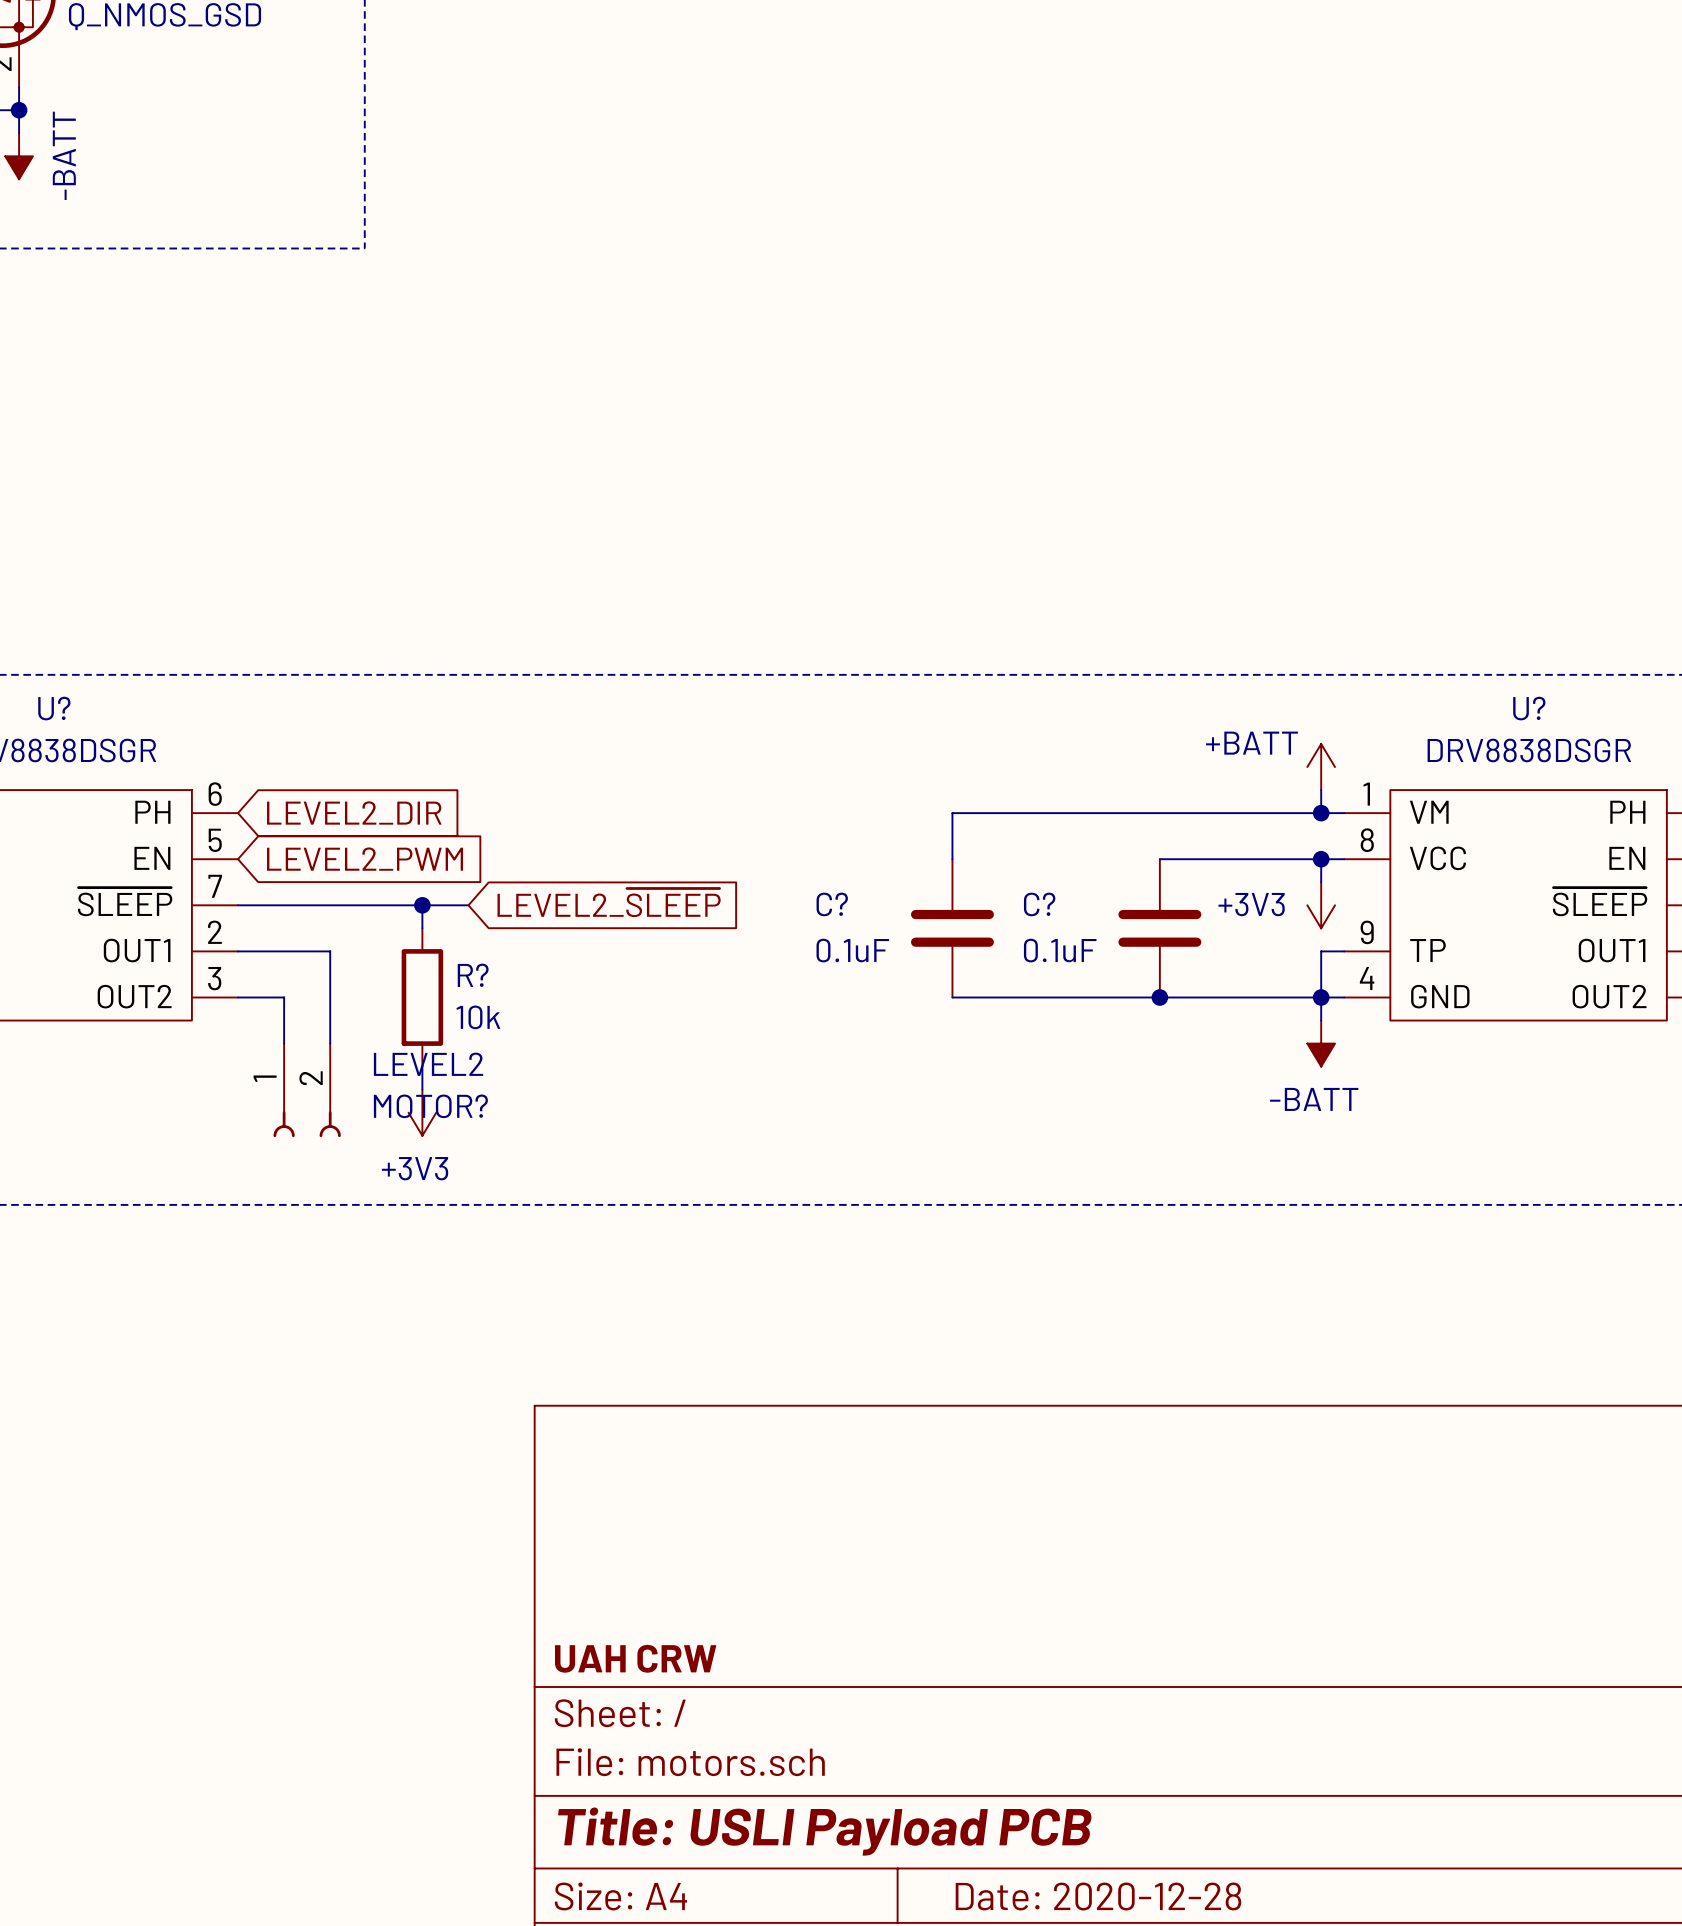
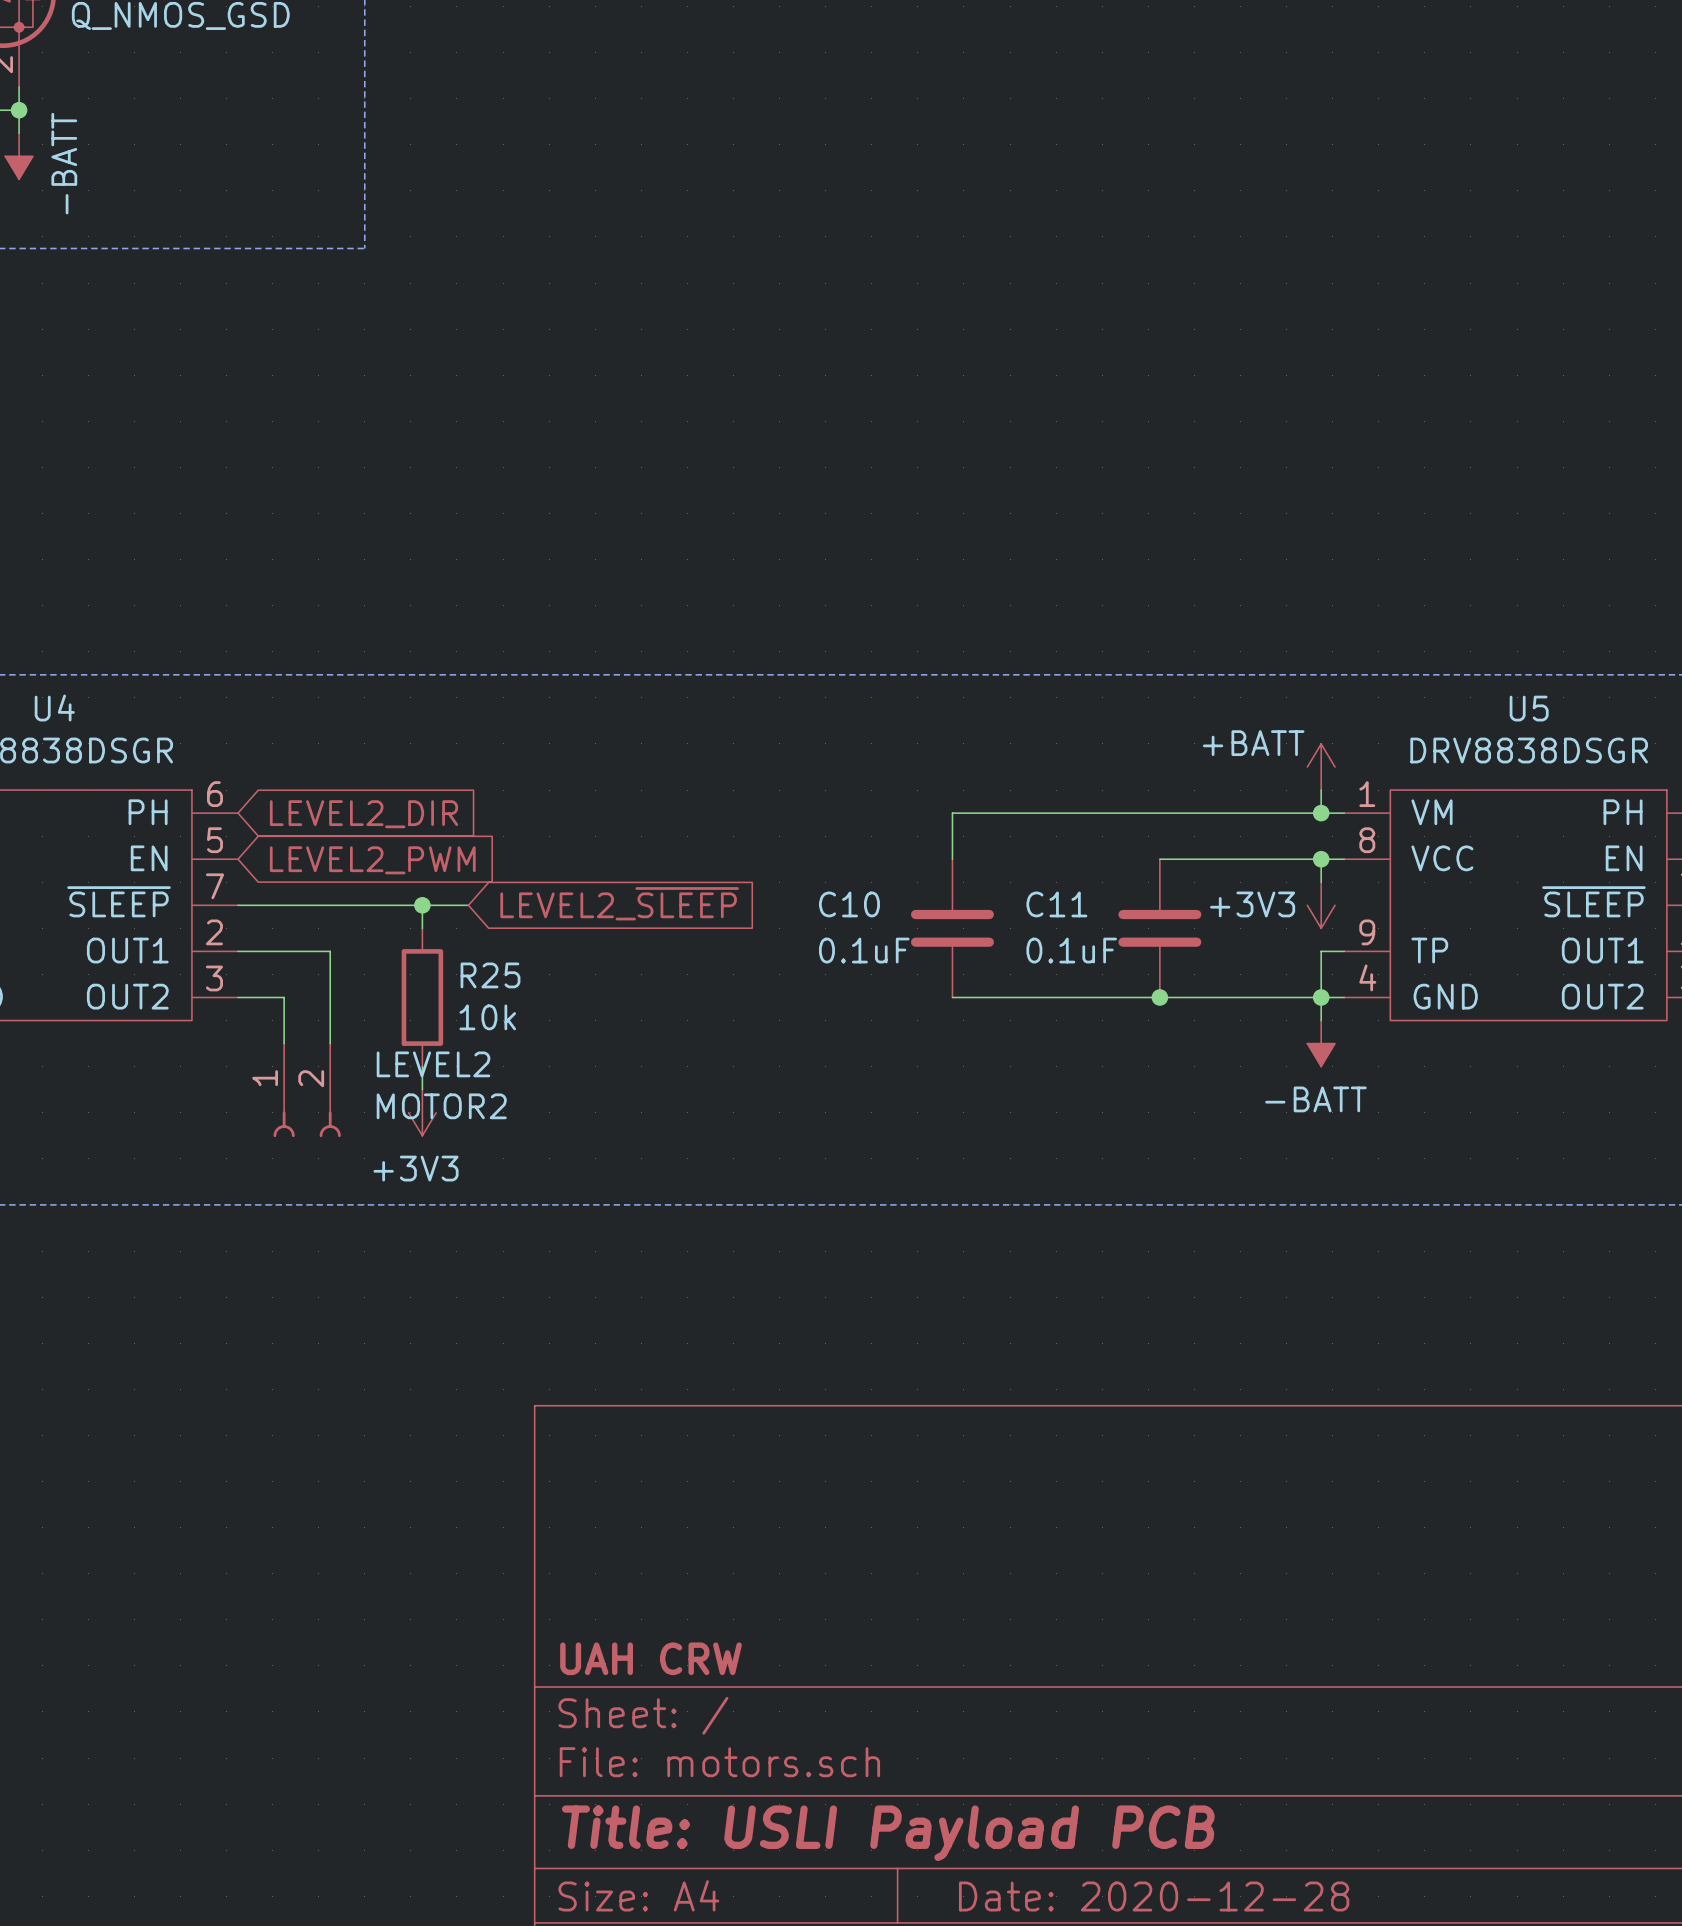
U? name: U? (54, 708) -> U4 (54, 708)
U? name: U? (1529, 708) -> U5 (1529, 708)
C? name: C? (832, 904) -> C10 (849, 904)
C? name: C? (1039, 904) -> C11 (1056, 904)
R? name: R? (473, 975) -> R25 (490, 975)
MOTOR? name: MOTOR? (430, 1106) -> MOTOR2 (441, 1106)

